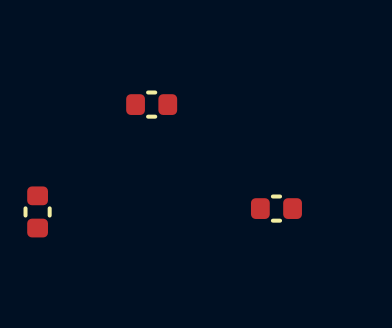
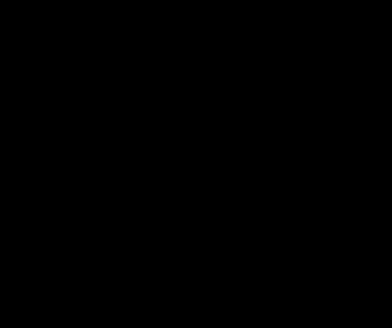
part: (151, 104) -> none
part: (276, 208) -> none
part: (37, 211) -> none

